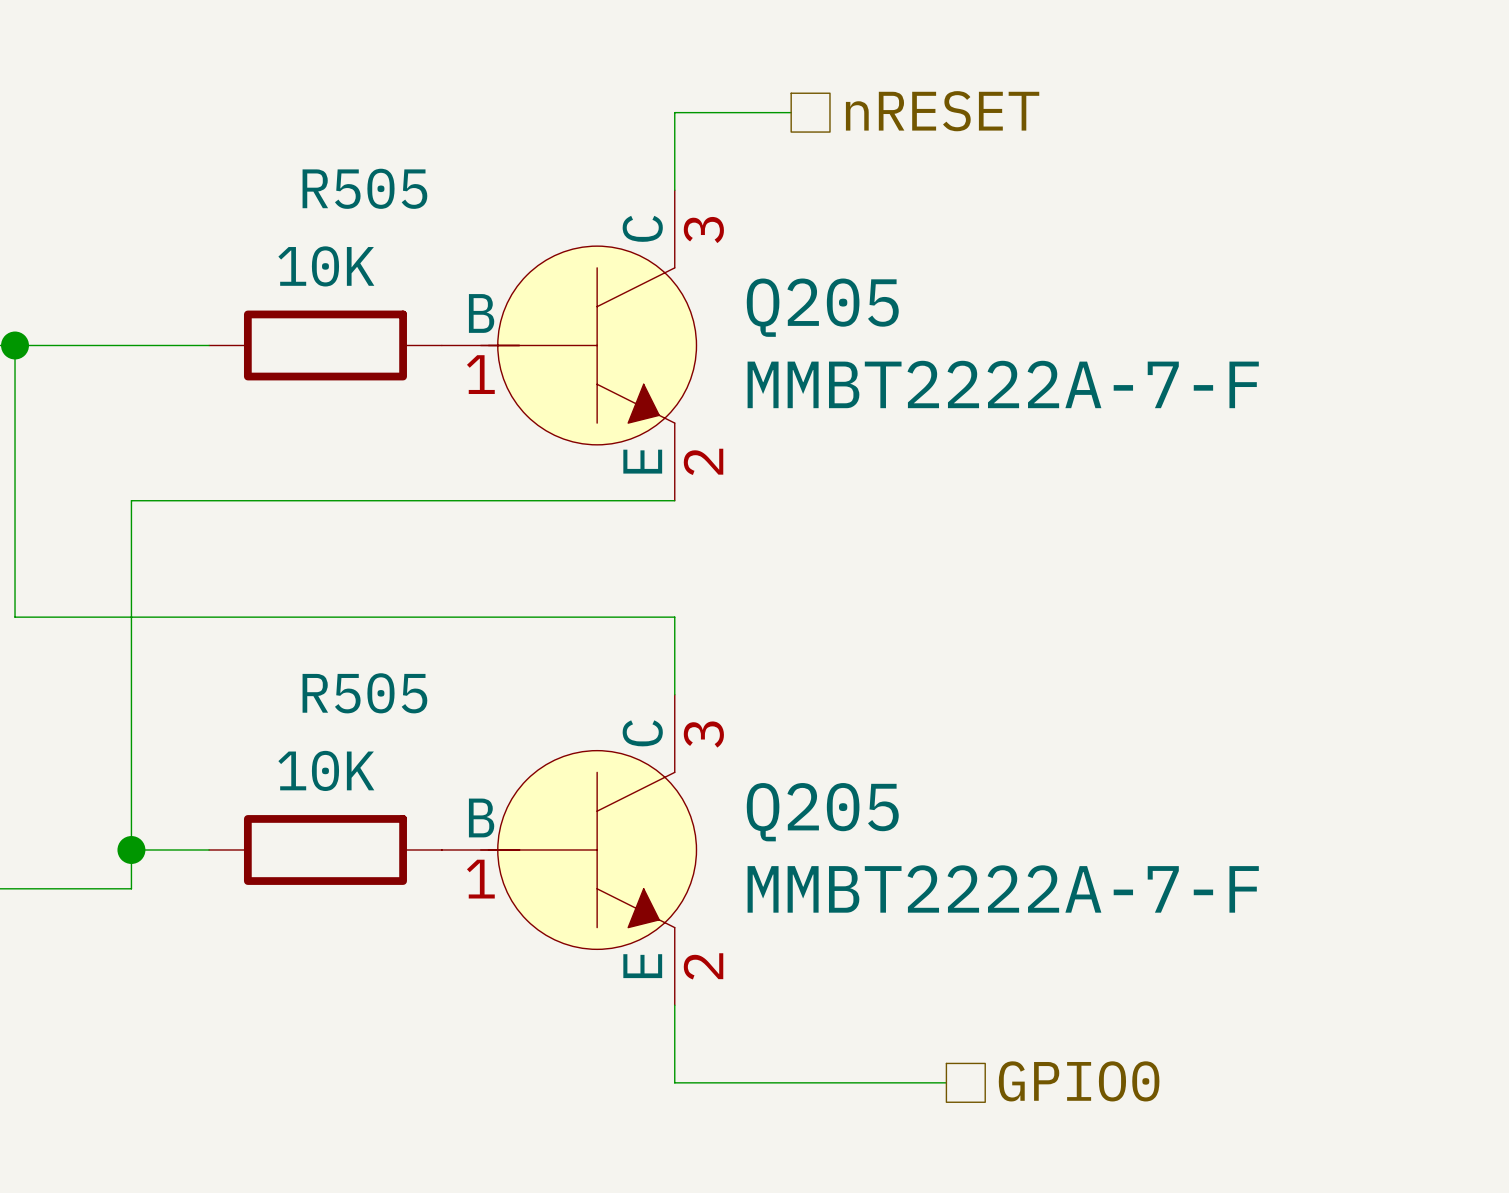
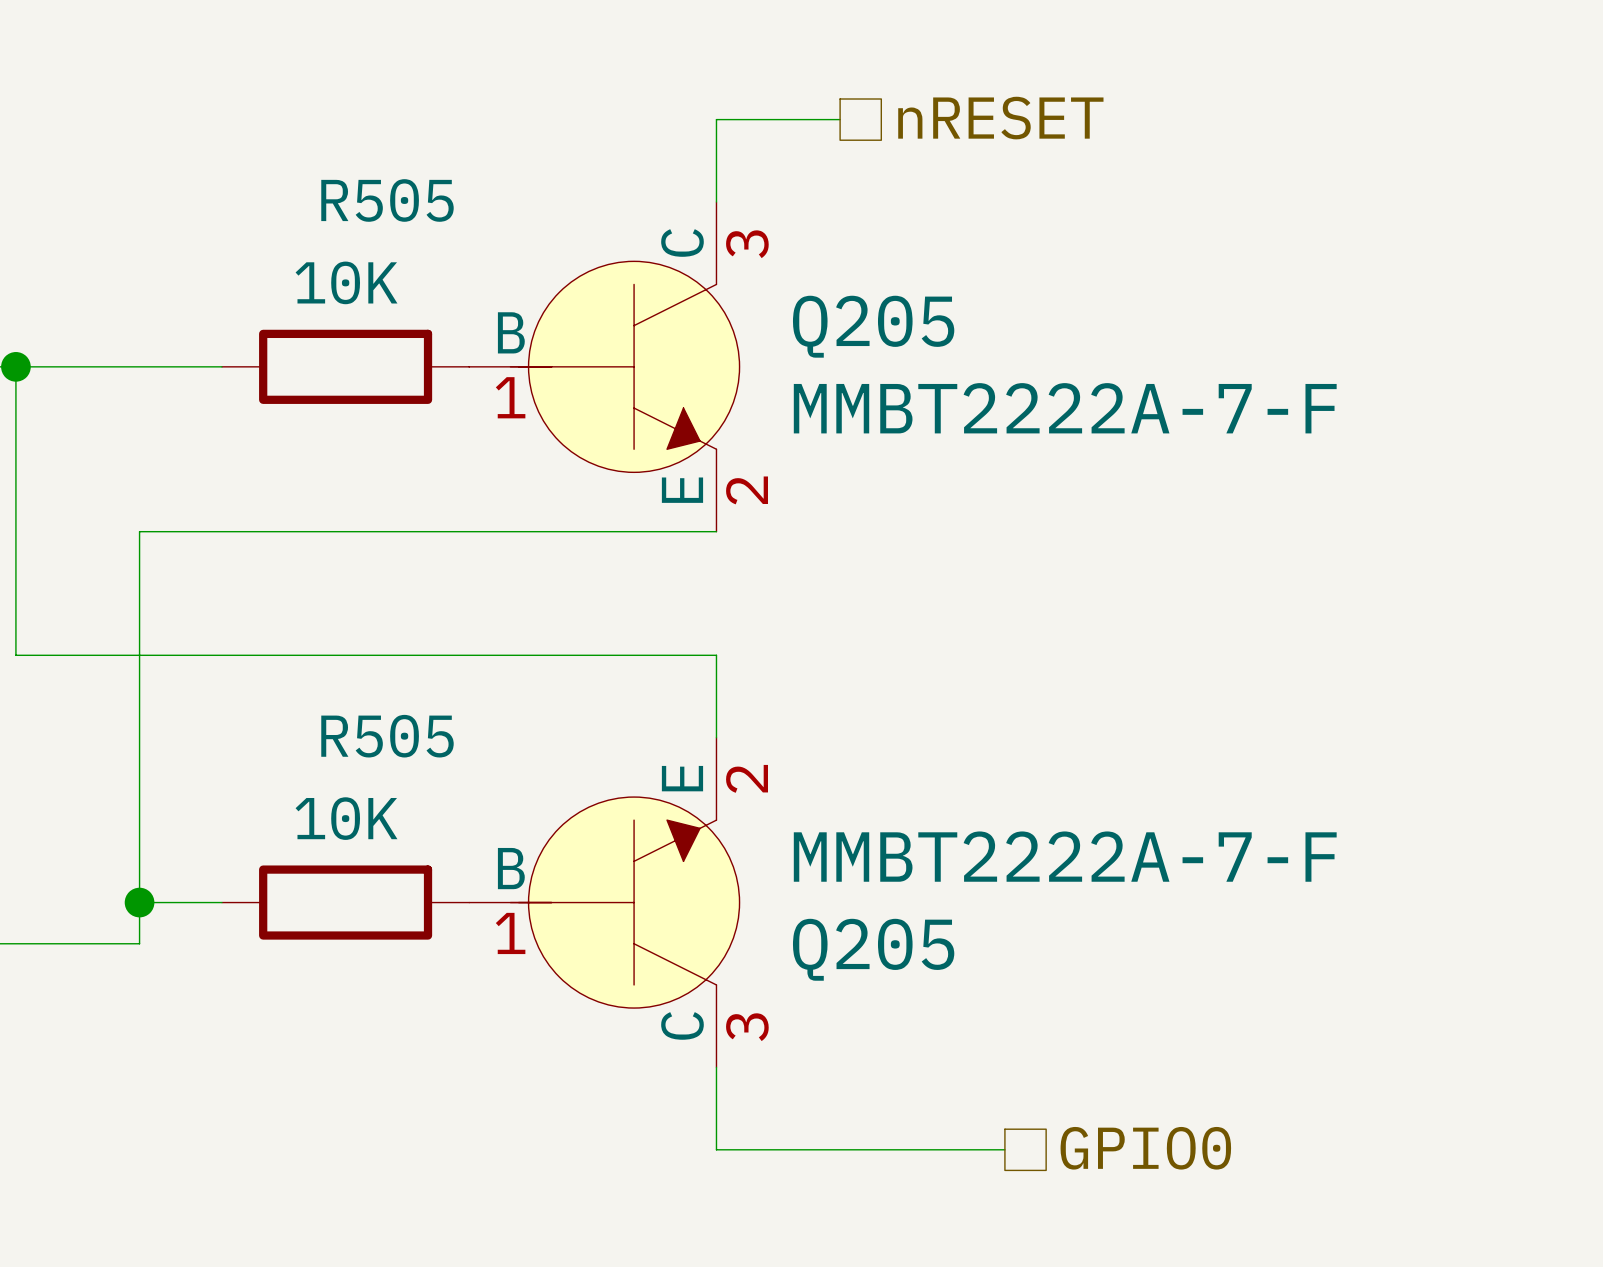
Q205 flip: as is (588, 849) -> up-down (624, 902)

